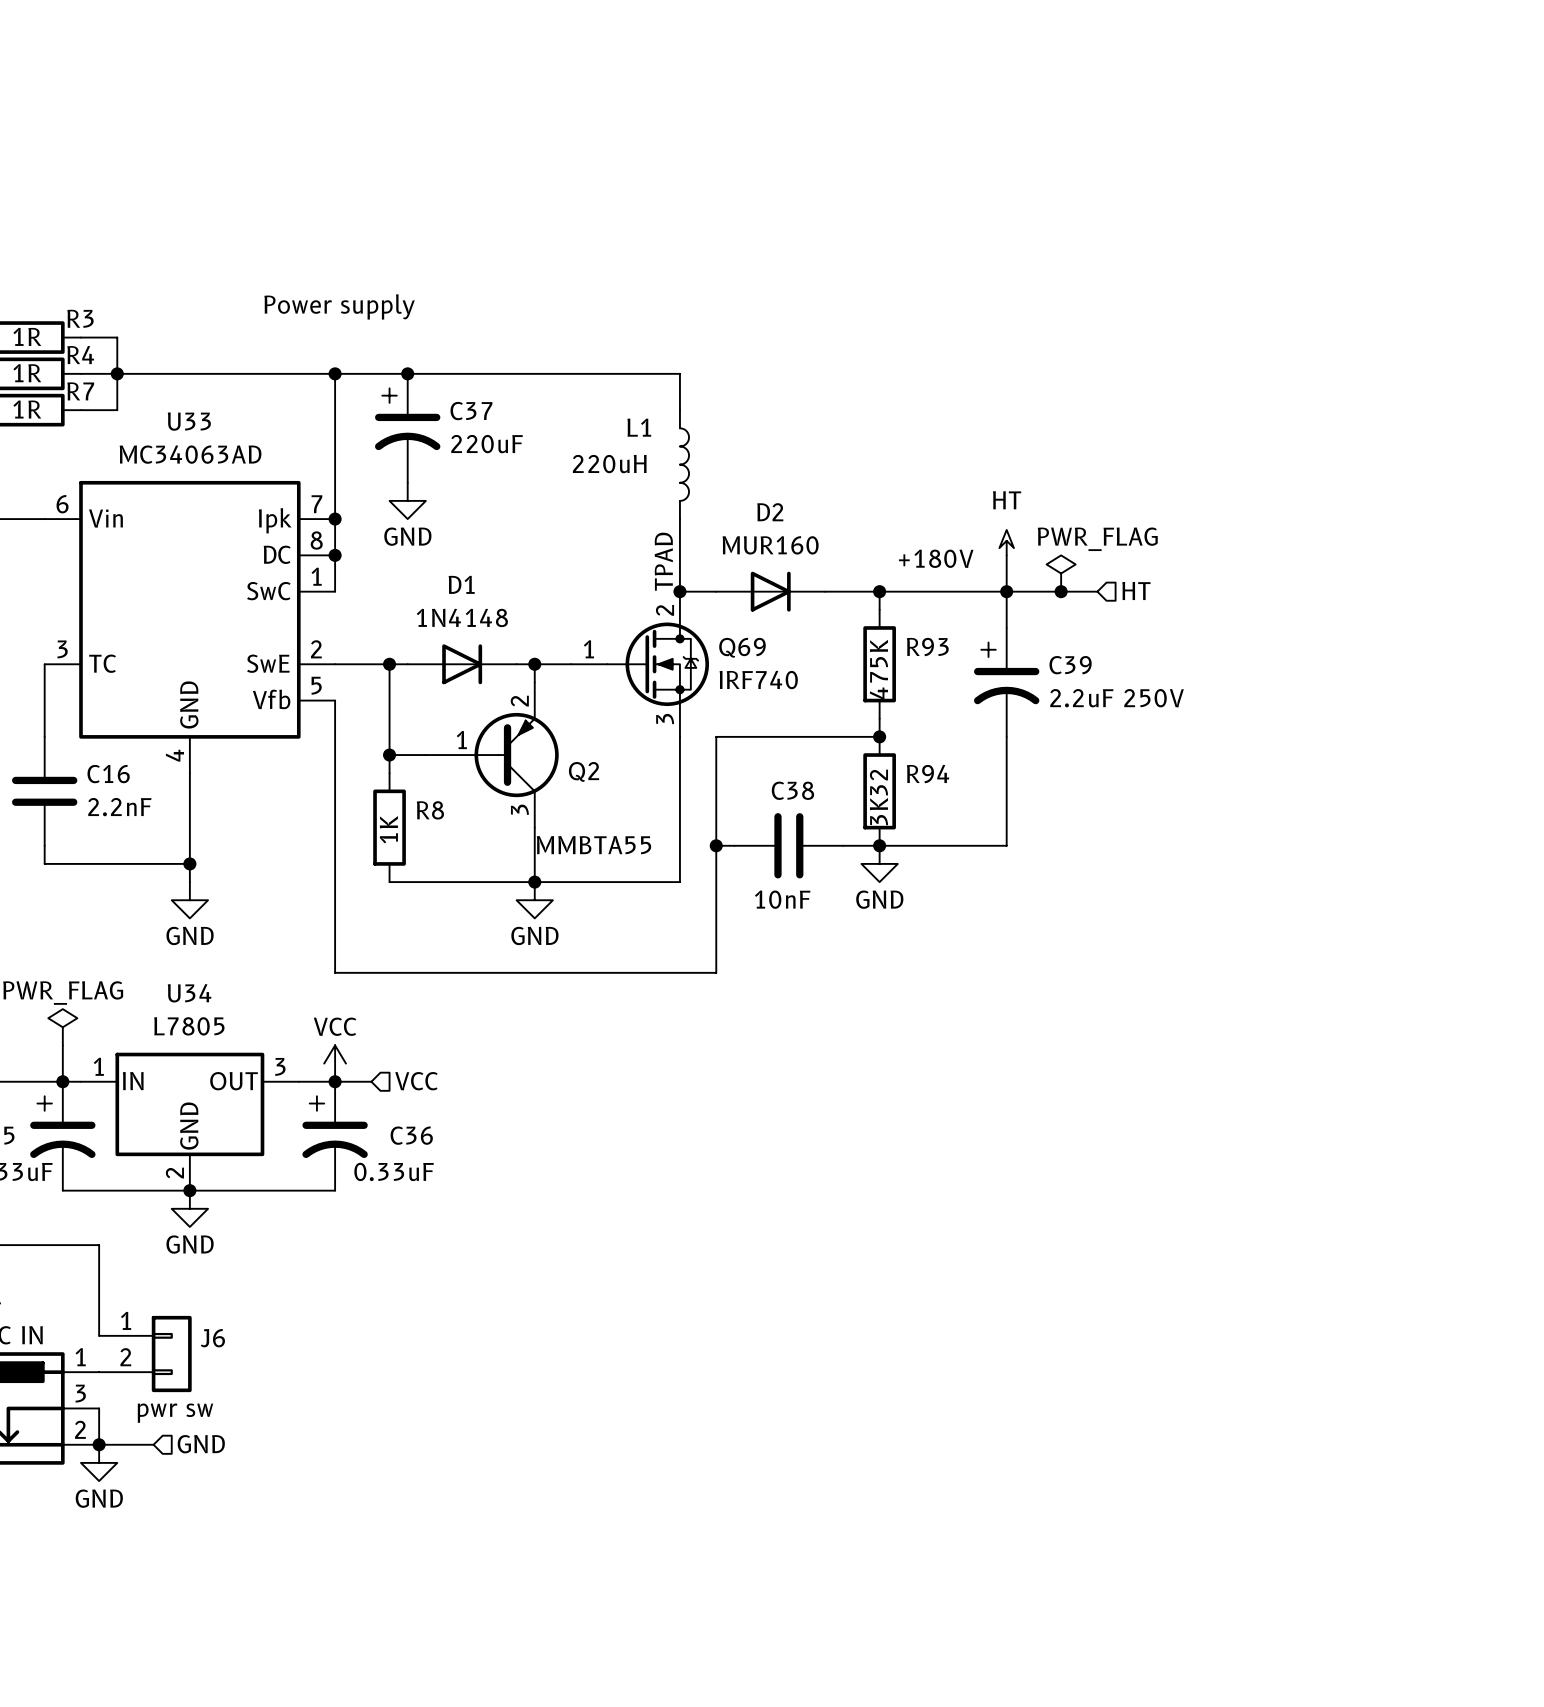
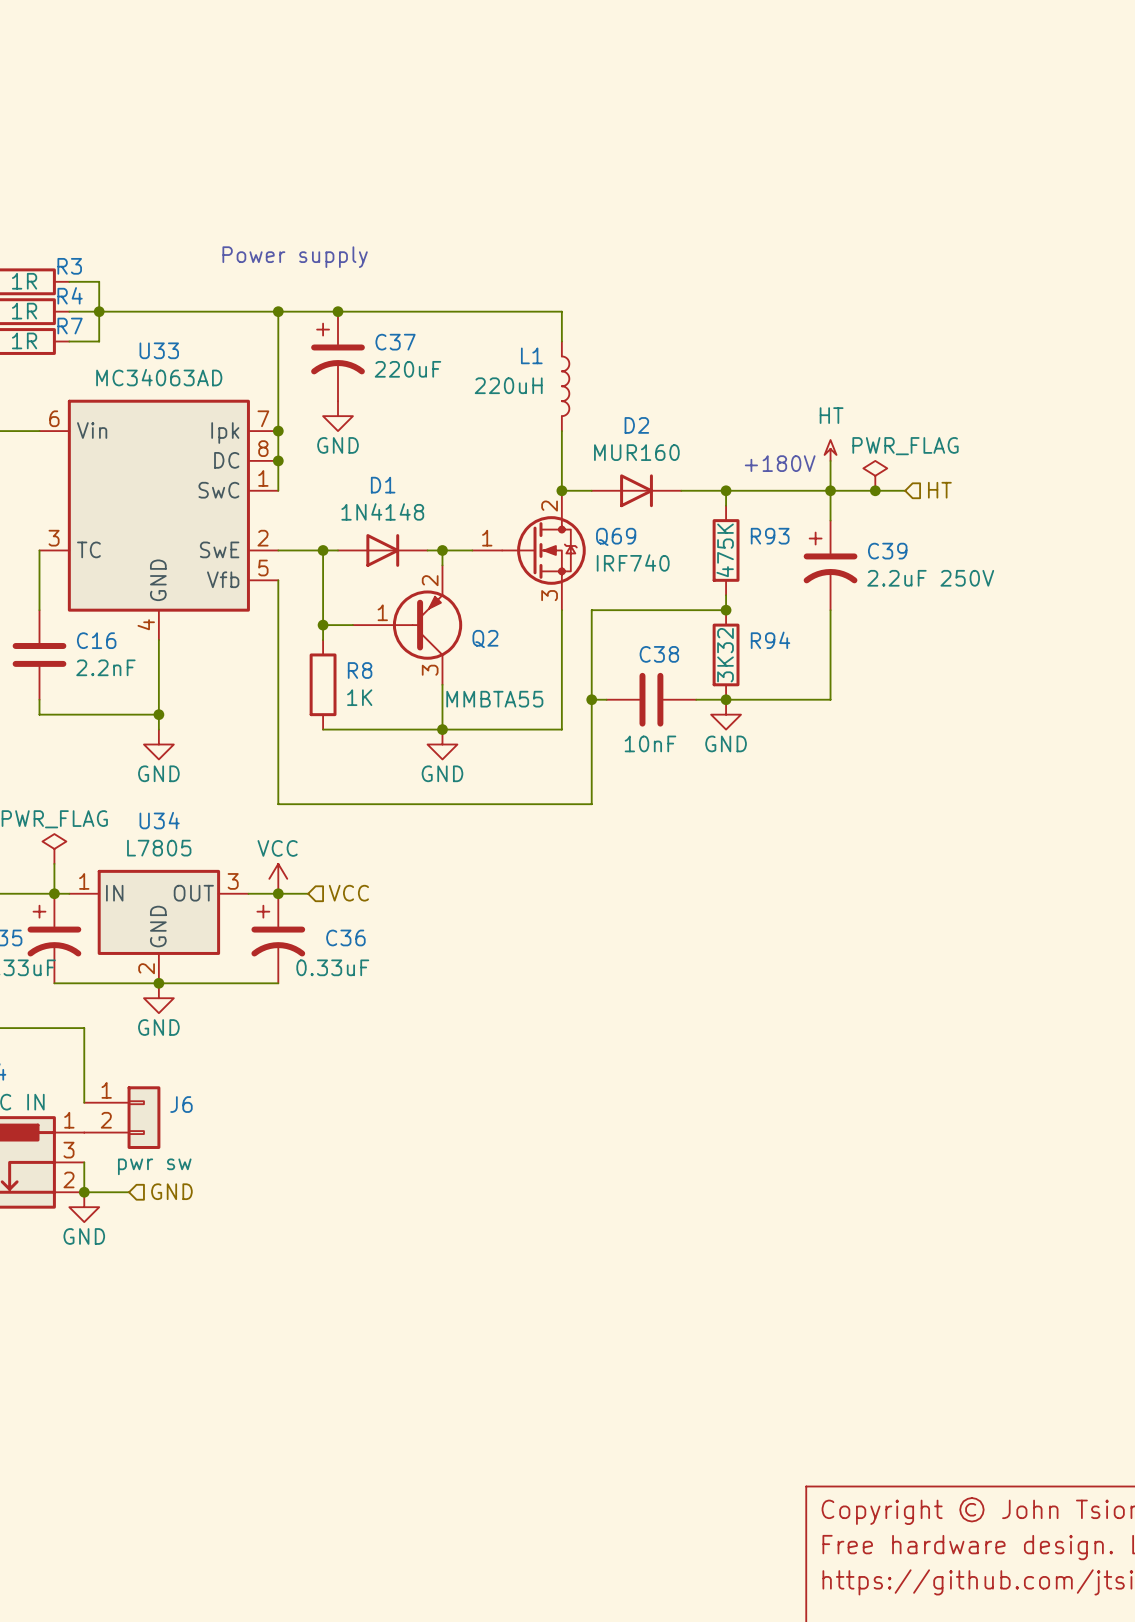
label: TPAD (663, 561) -> none
R8 value rotation: 0° (388, 829) -> 90° clockwise (359, 697)
R8 value position: 1K (388, 829) -> 1K (359, 697)

